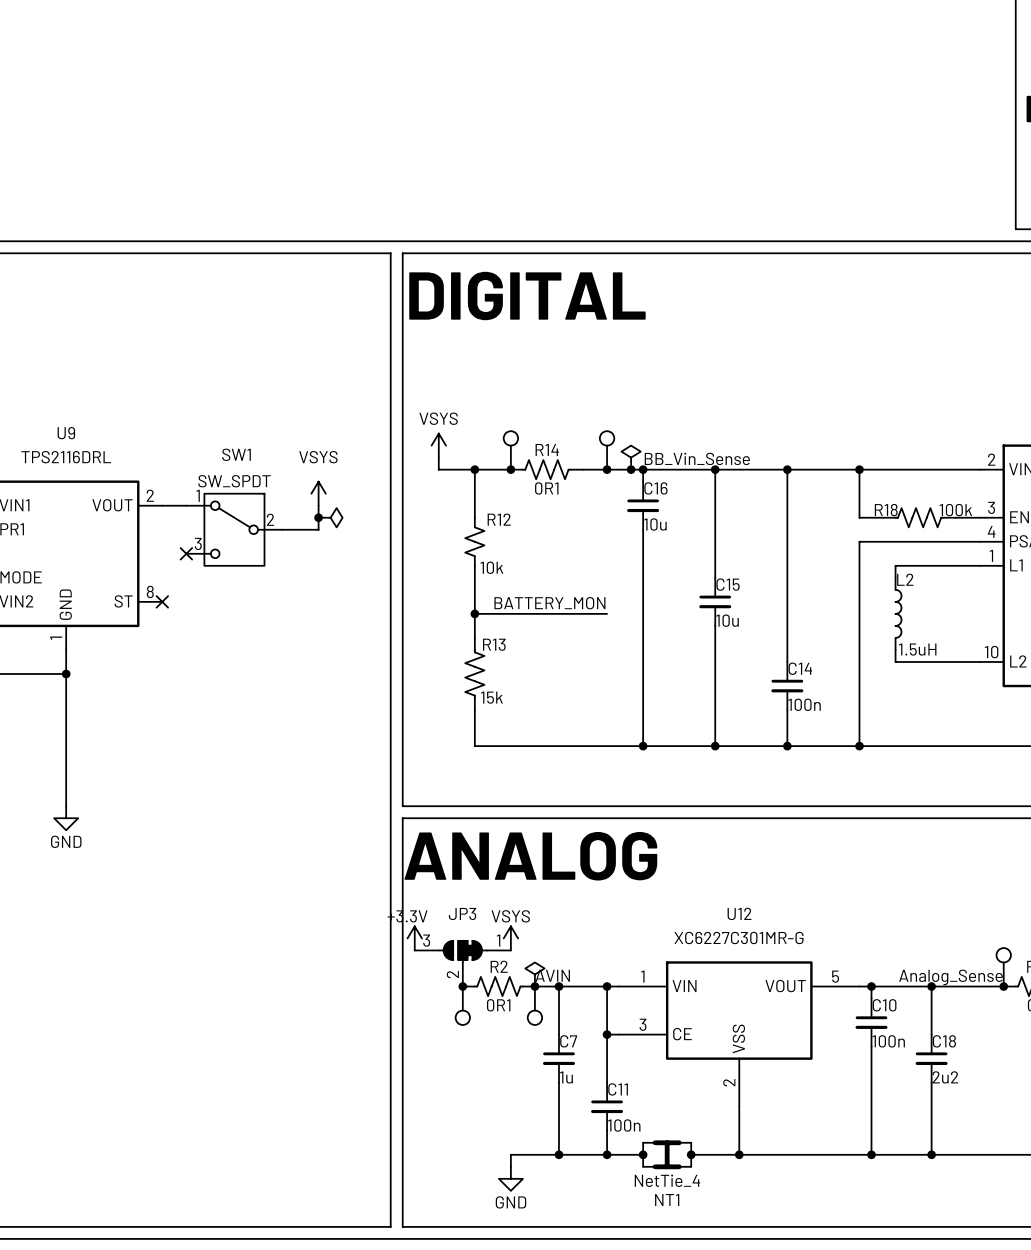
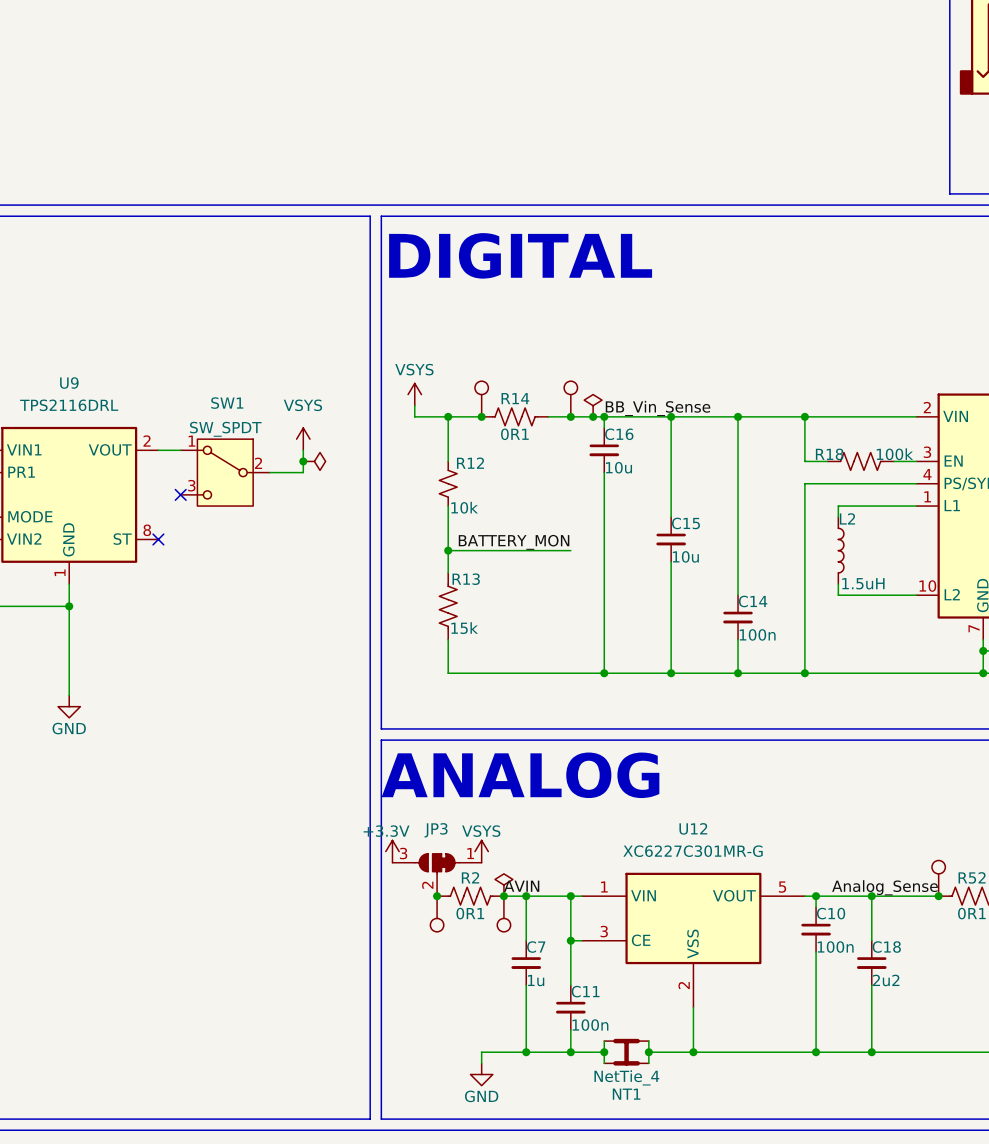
wire: (66, 770) (66, 806) -> none
power symbol position: GND (66, 818) -> GND (69, 706)

